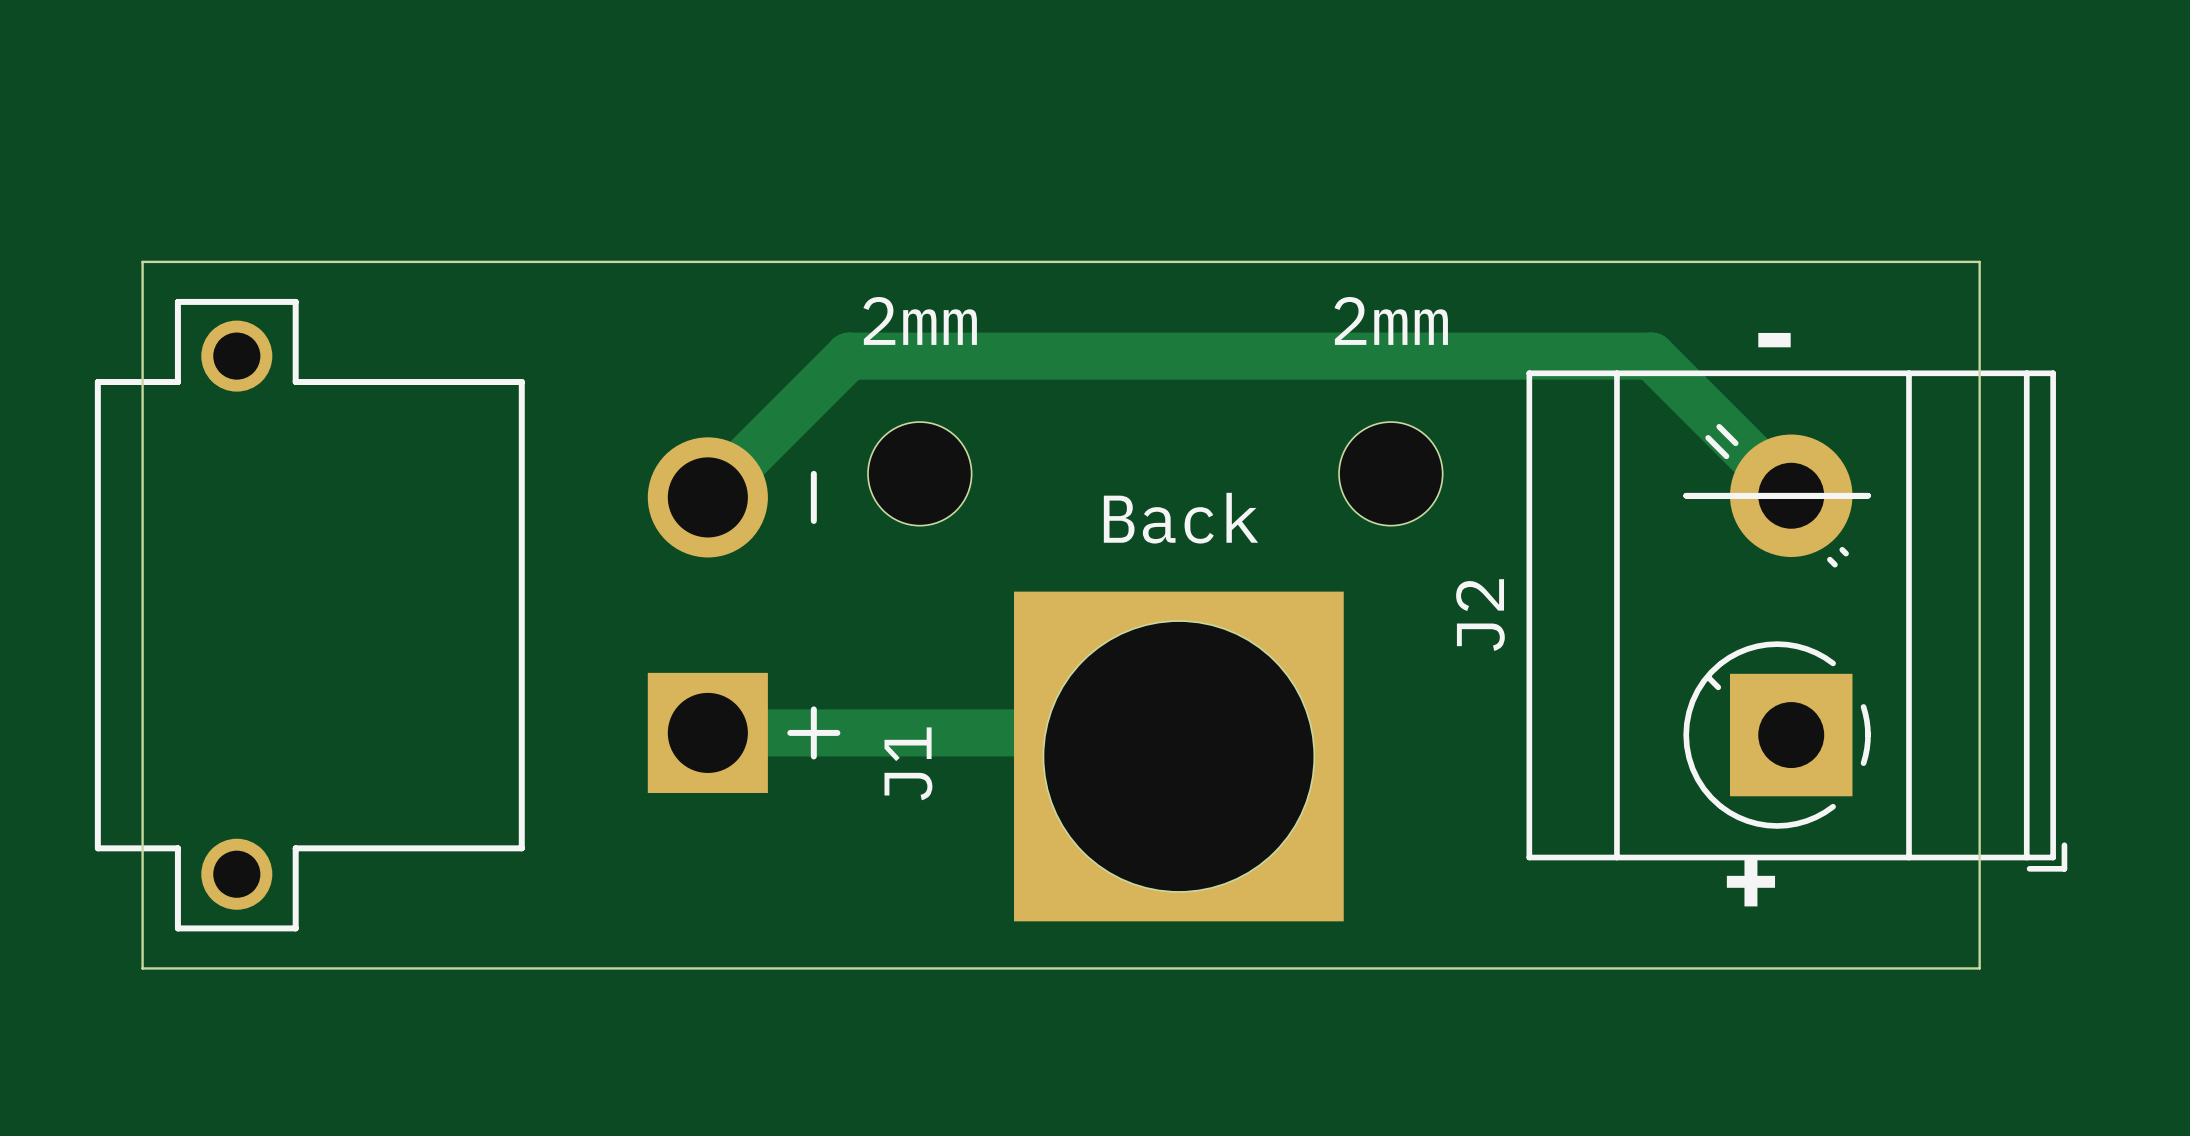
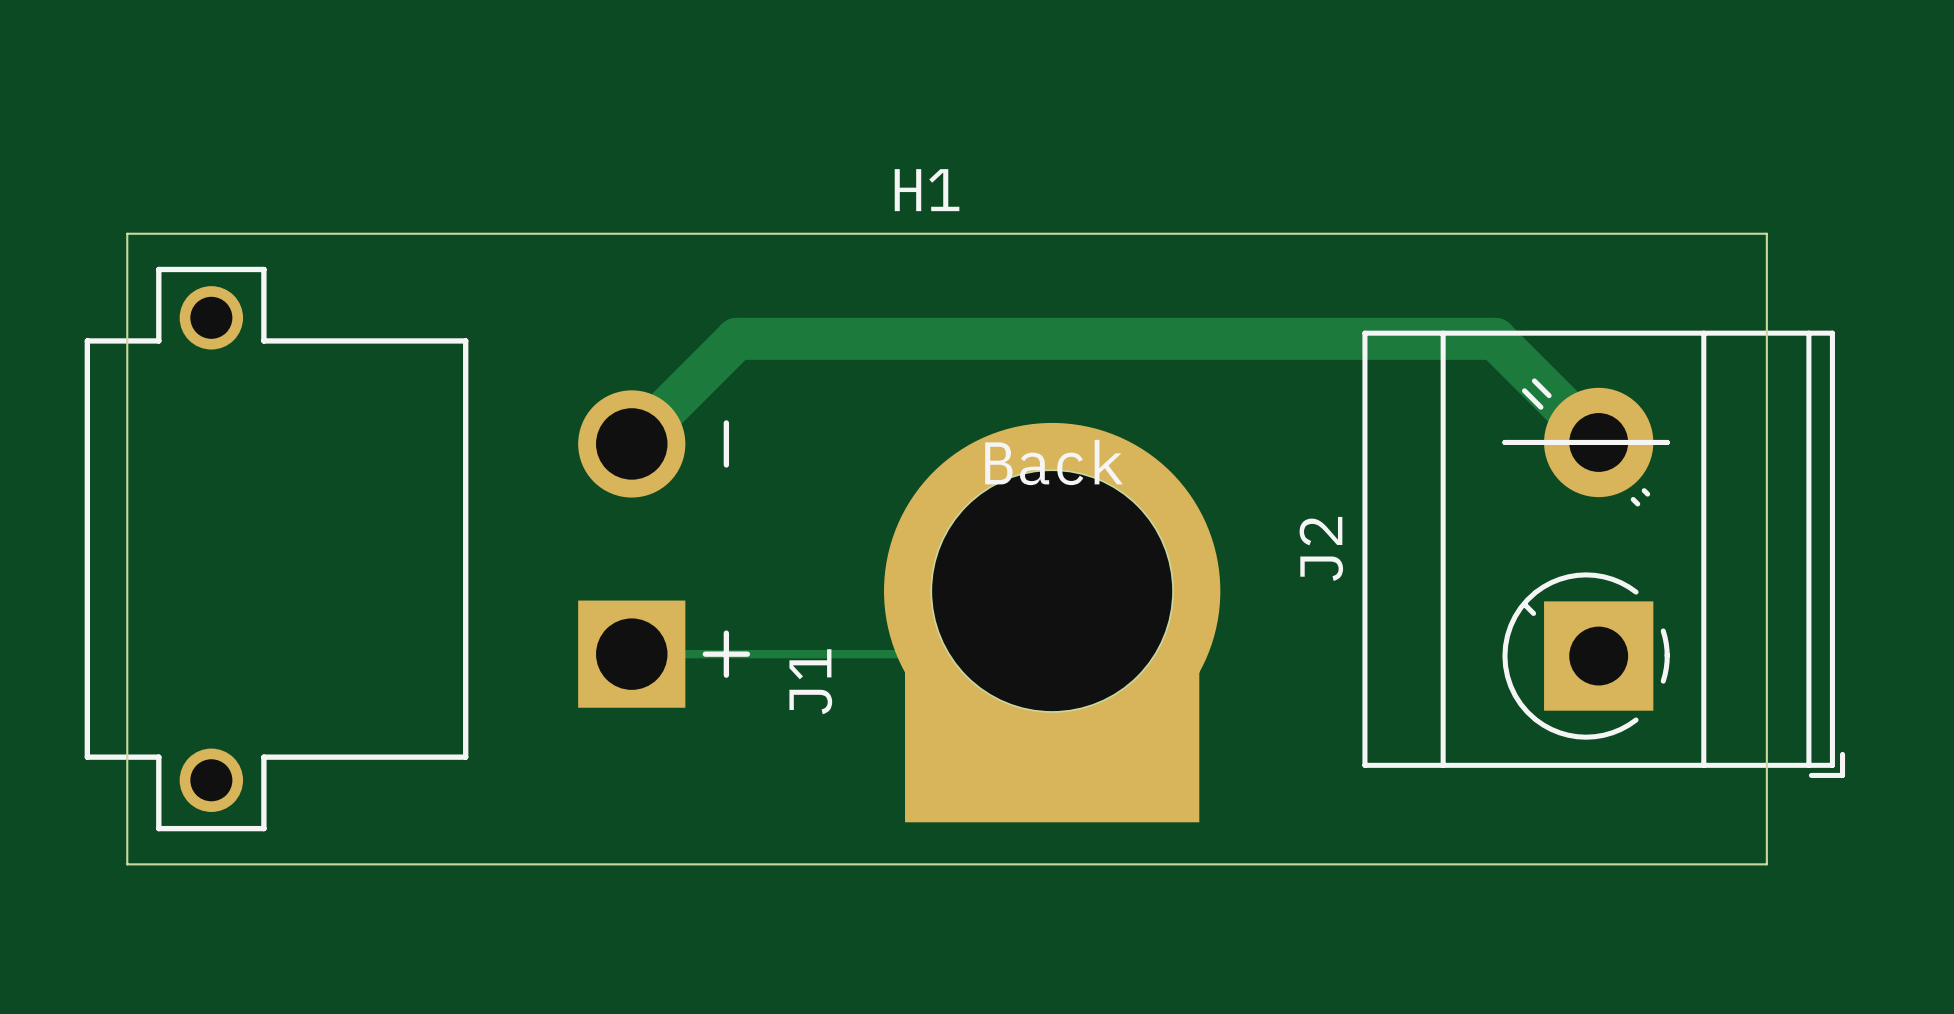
text: - (1774, 340) -> none
track: (825, 379) (849, 356) (1651, 356) (1675, 379) -> (736, 338) (1495, 338)
2mm: (919, 473) -> none
2mm: (1390, 473) -> none
H1: none -> (1052, 591)
track width: thick (707, 732) (1034, 732) -> thin (631, 654) (923, 654)
part: (1178, 756) -> none
text: + (1750, 881) -> none

